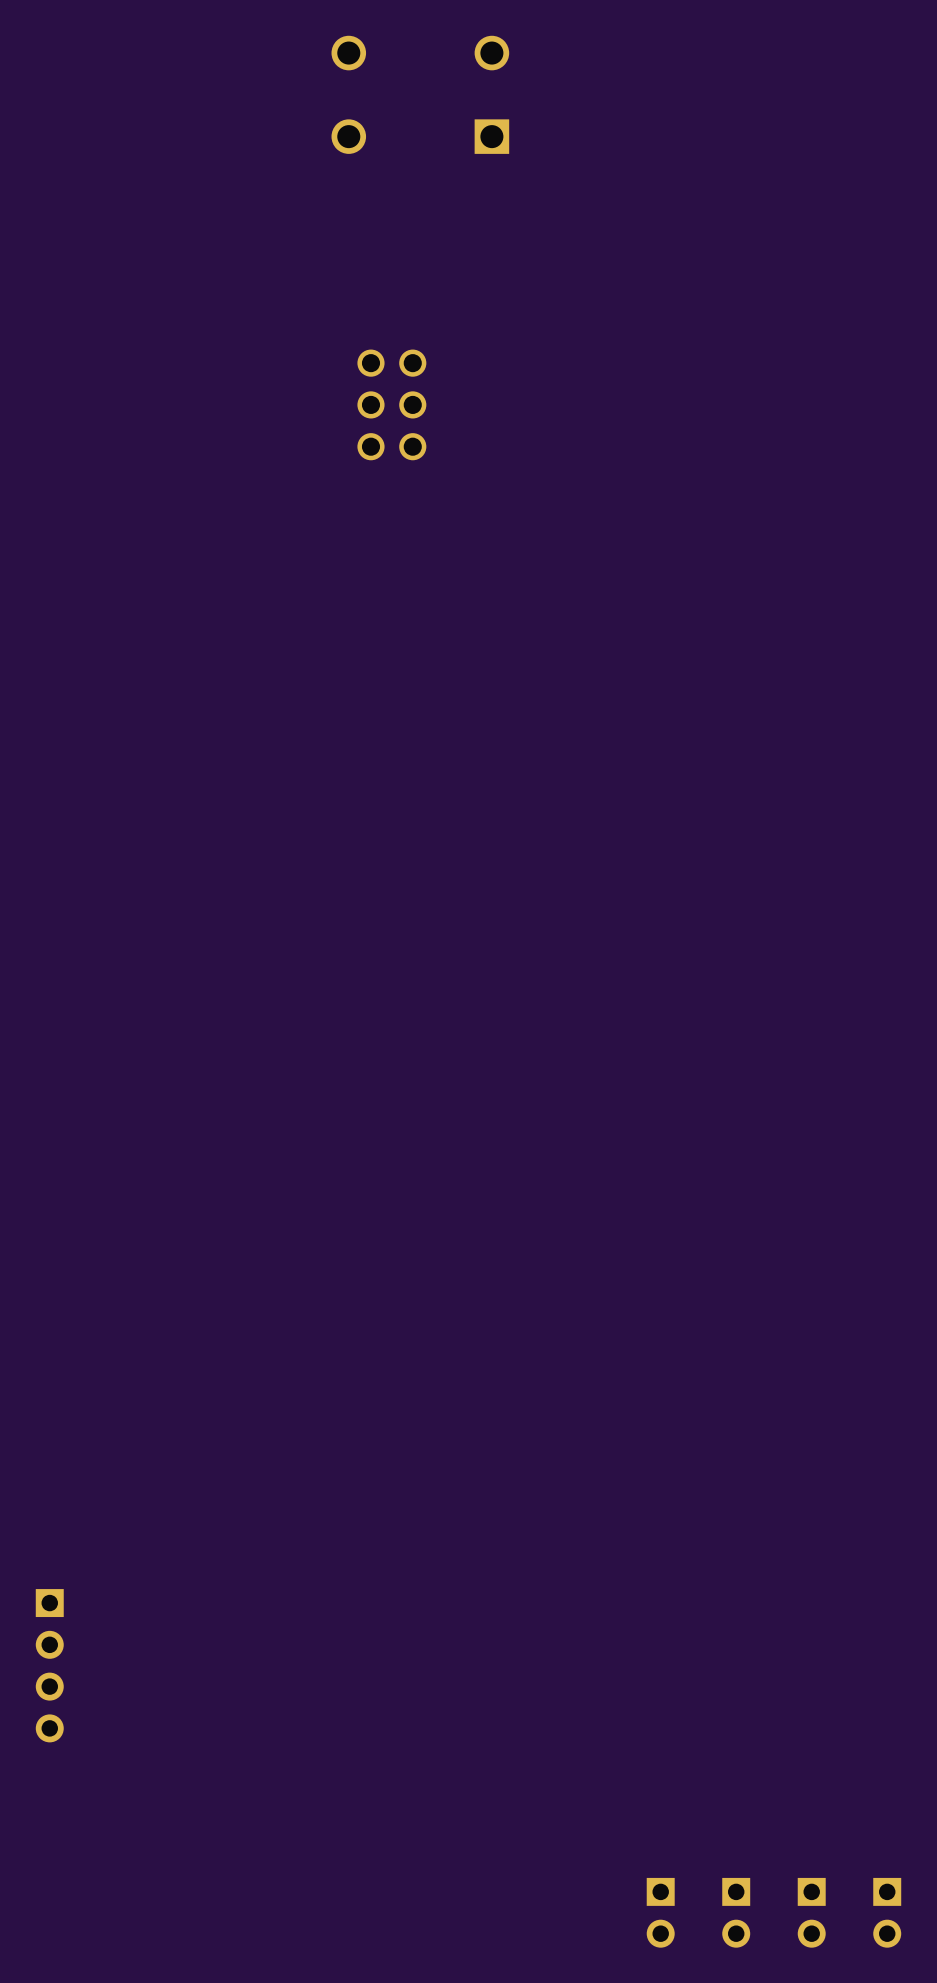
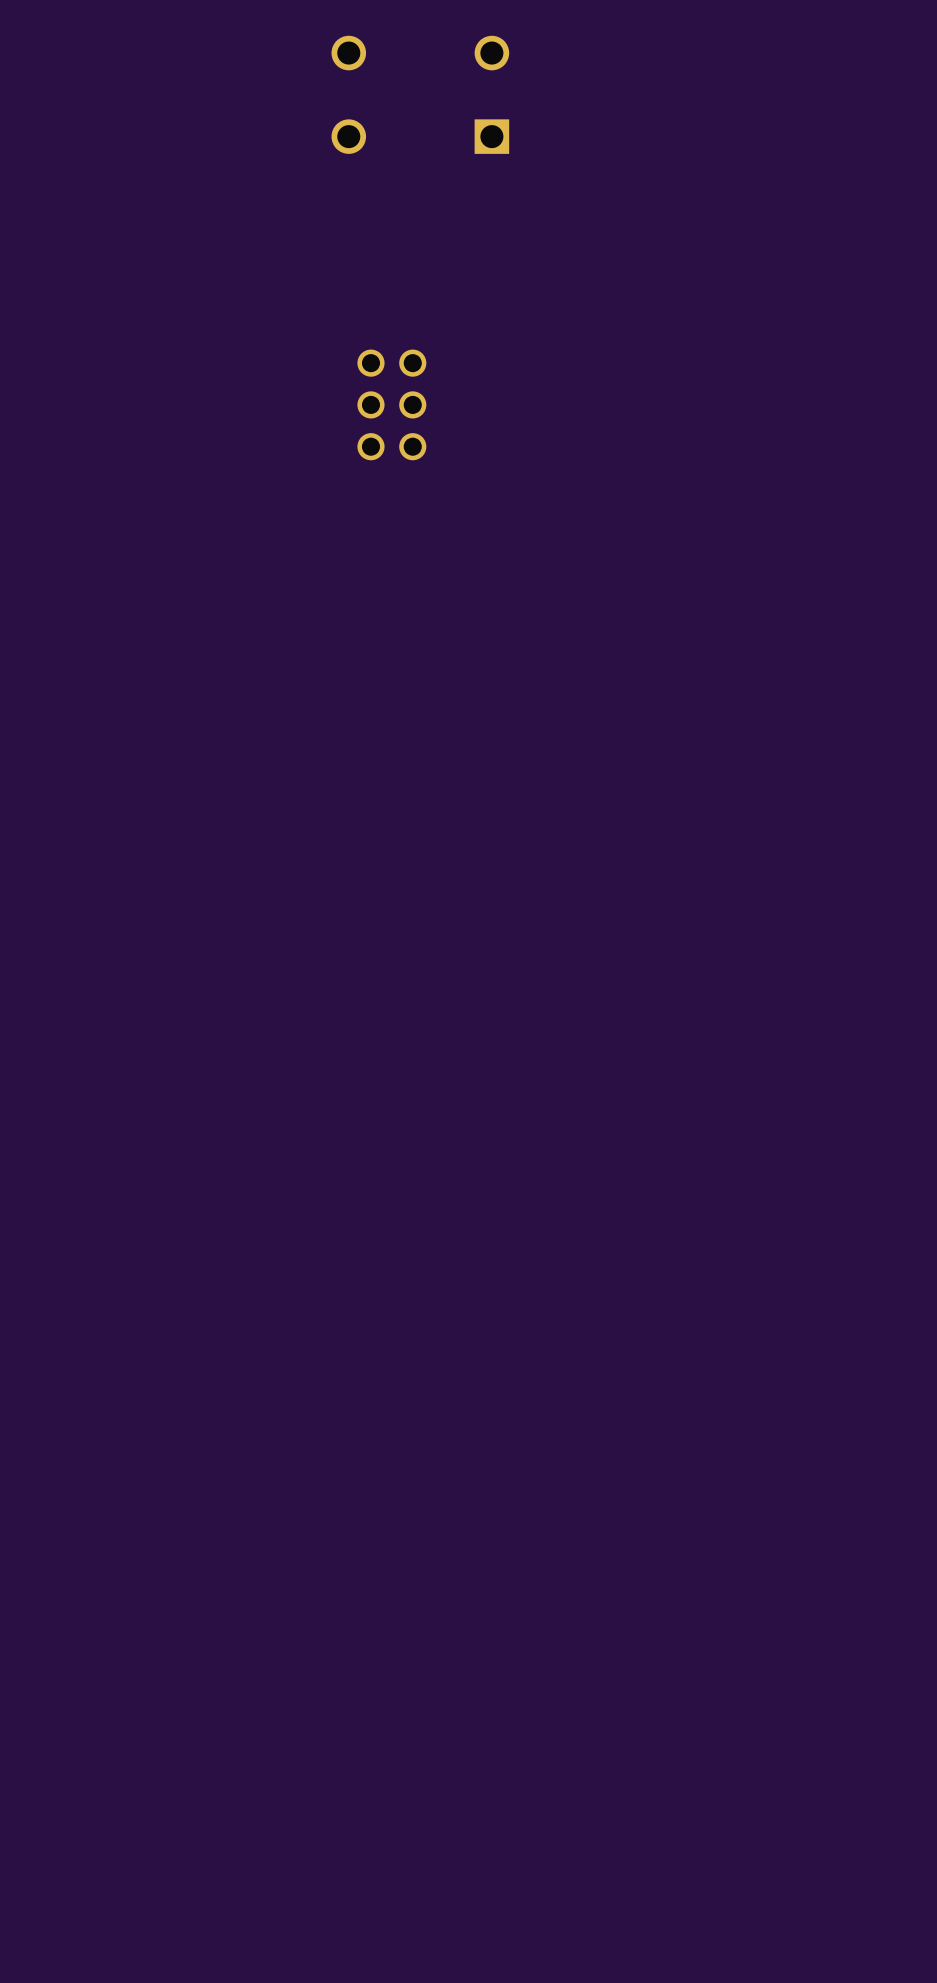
part: (49, 1665) -> none
part: (660, 1912) -> none
part: (736, 1912) -> none
part: (811, 1912) -> none
part: (887, 1912) -> none

